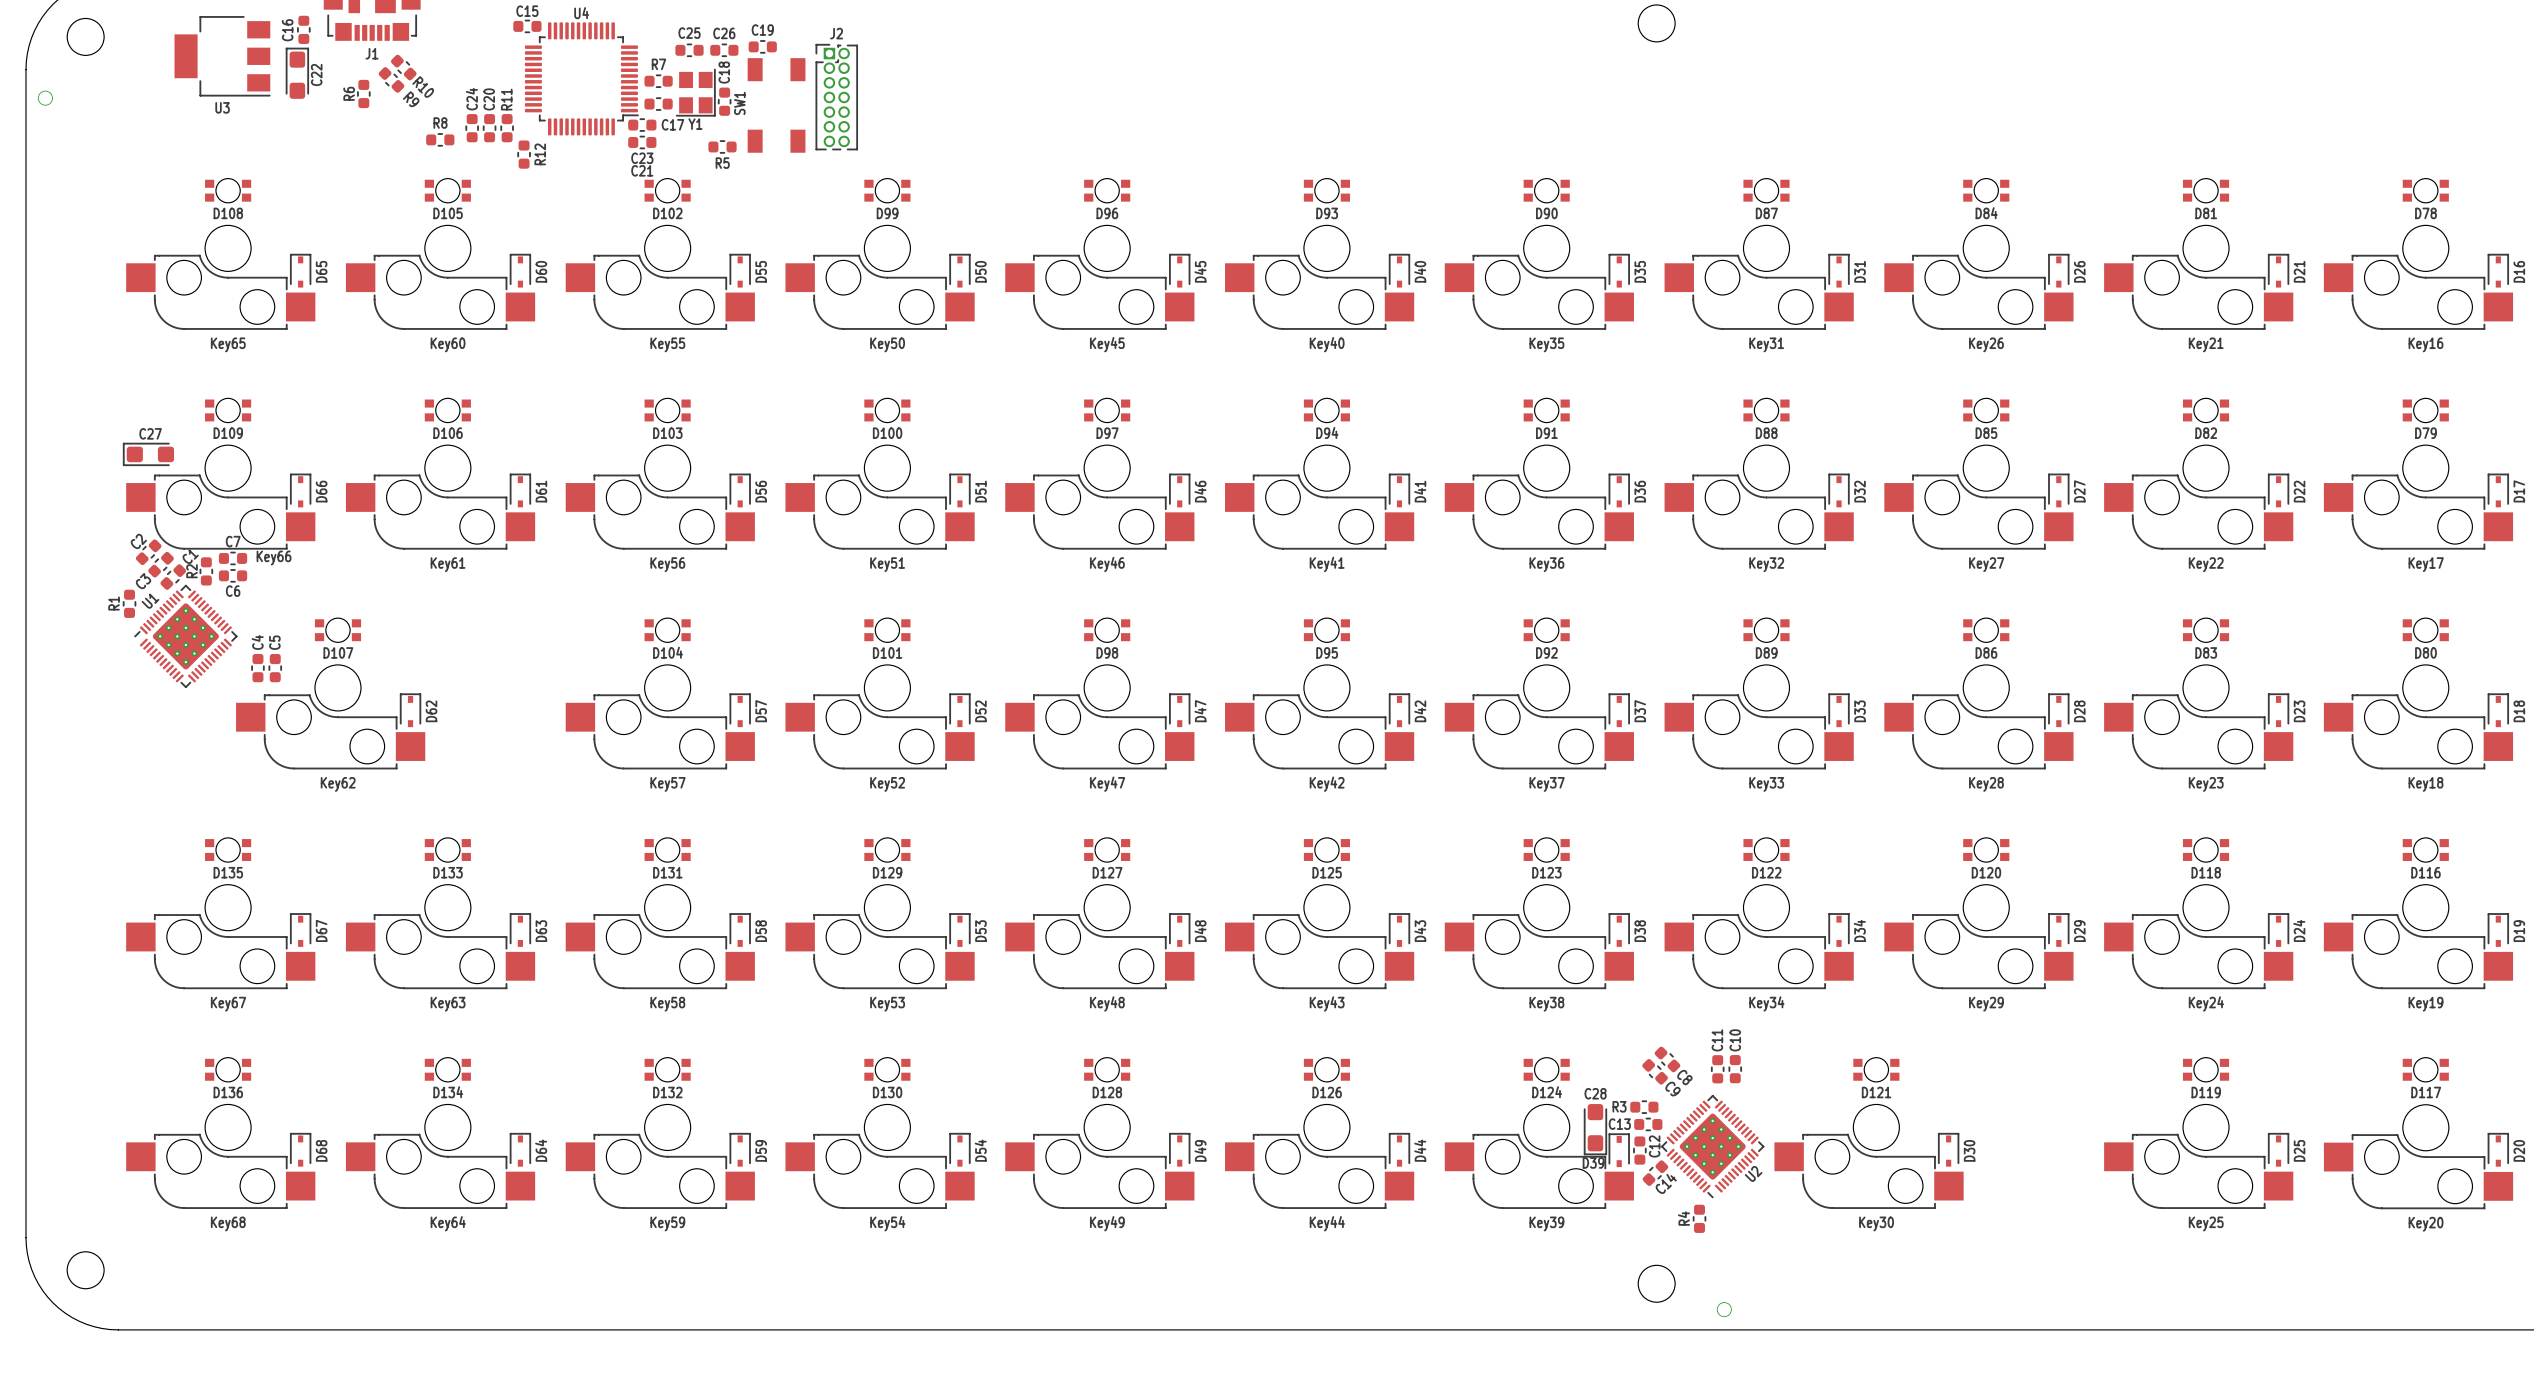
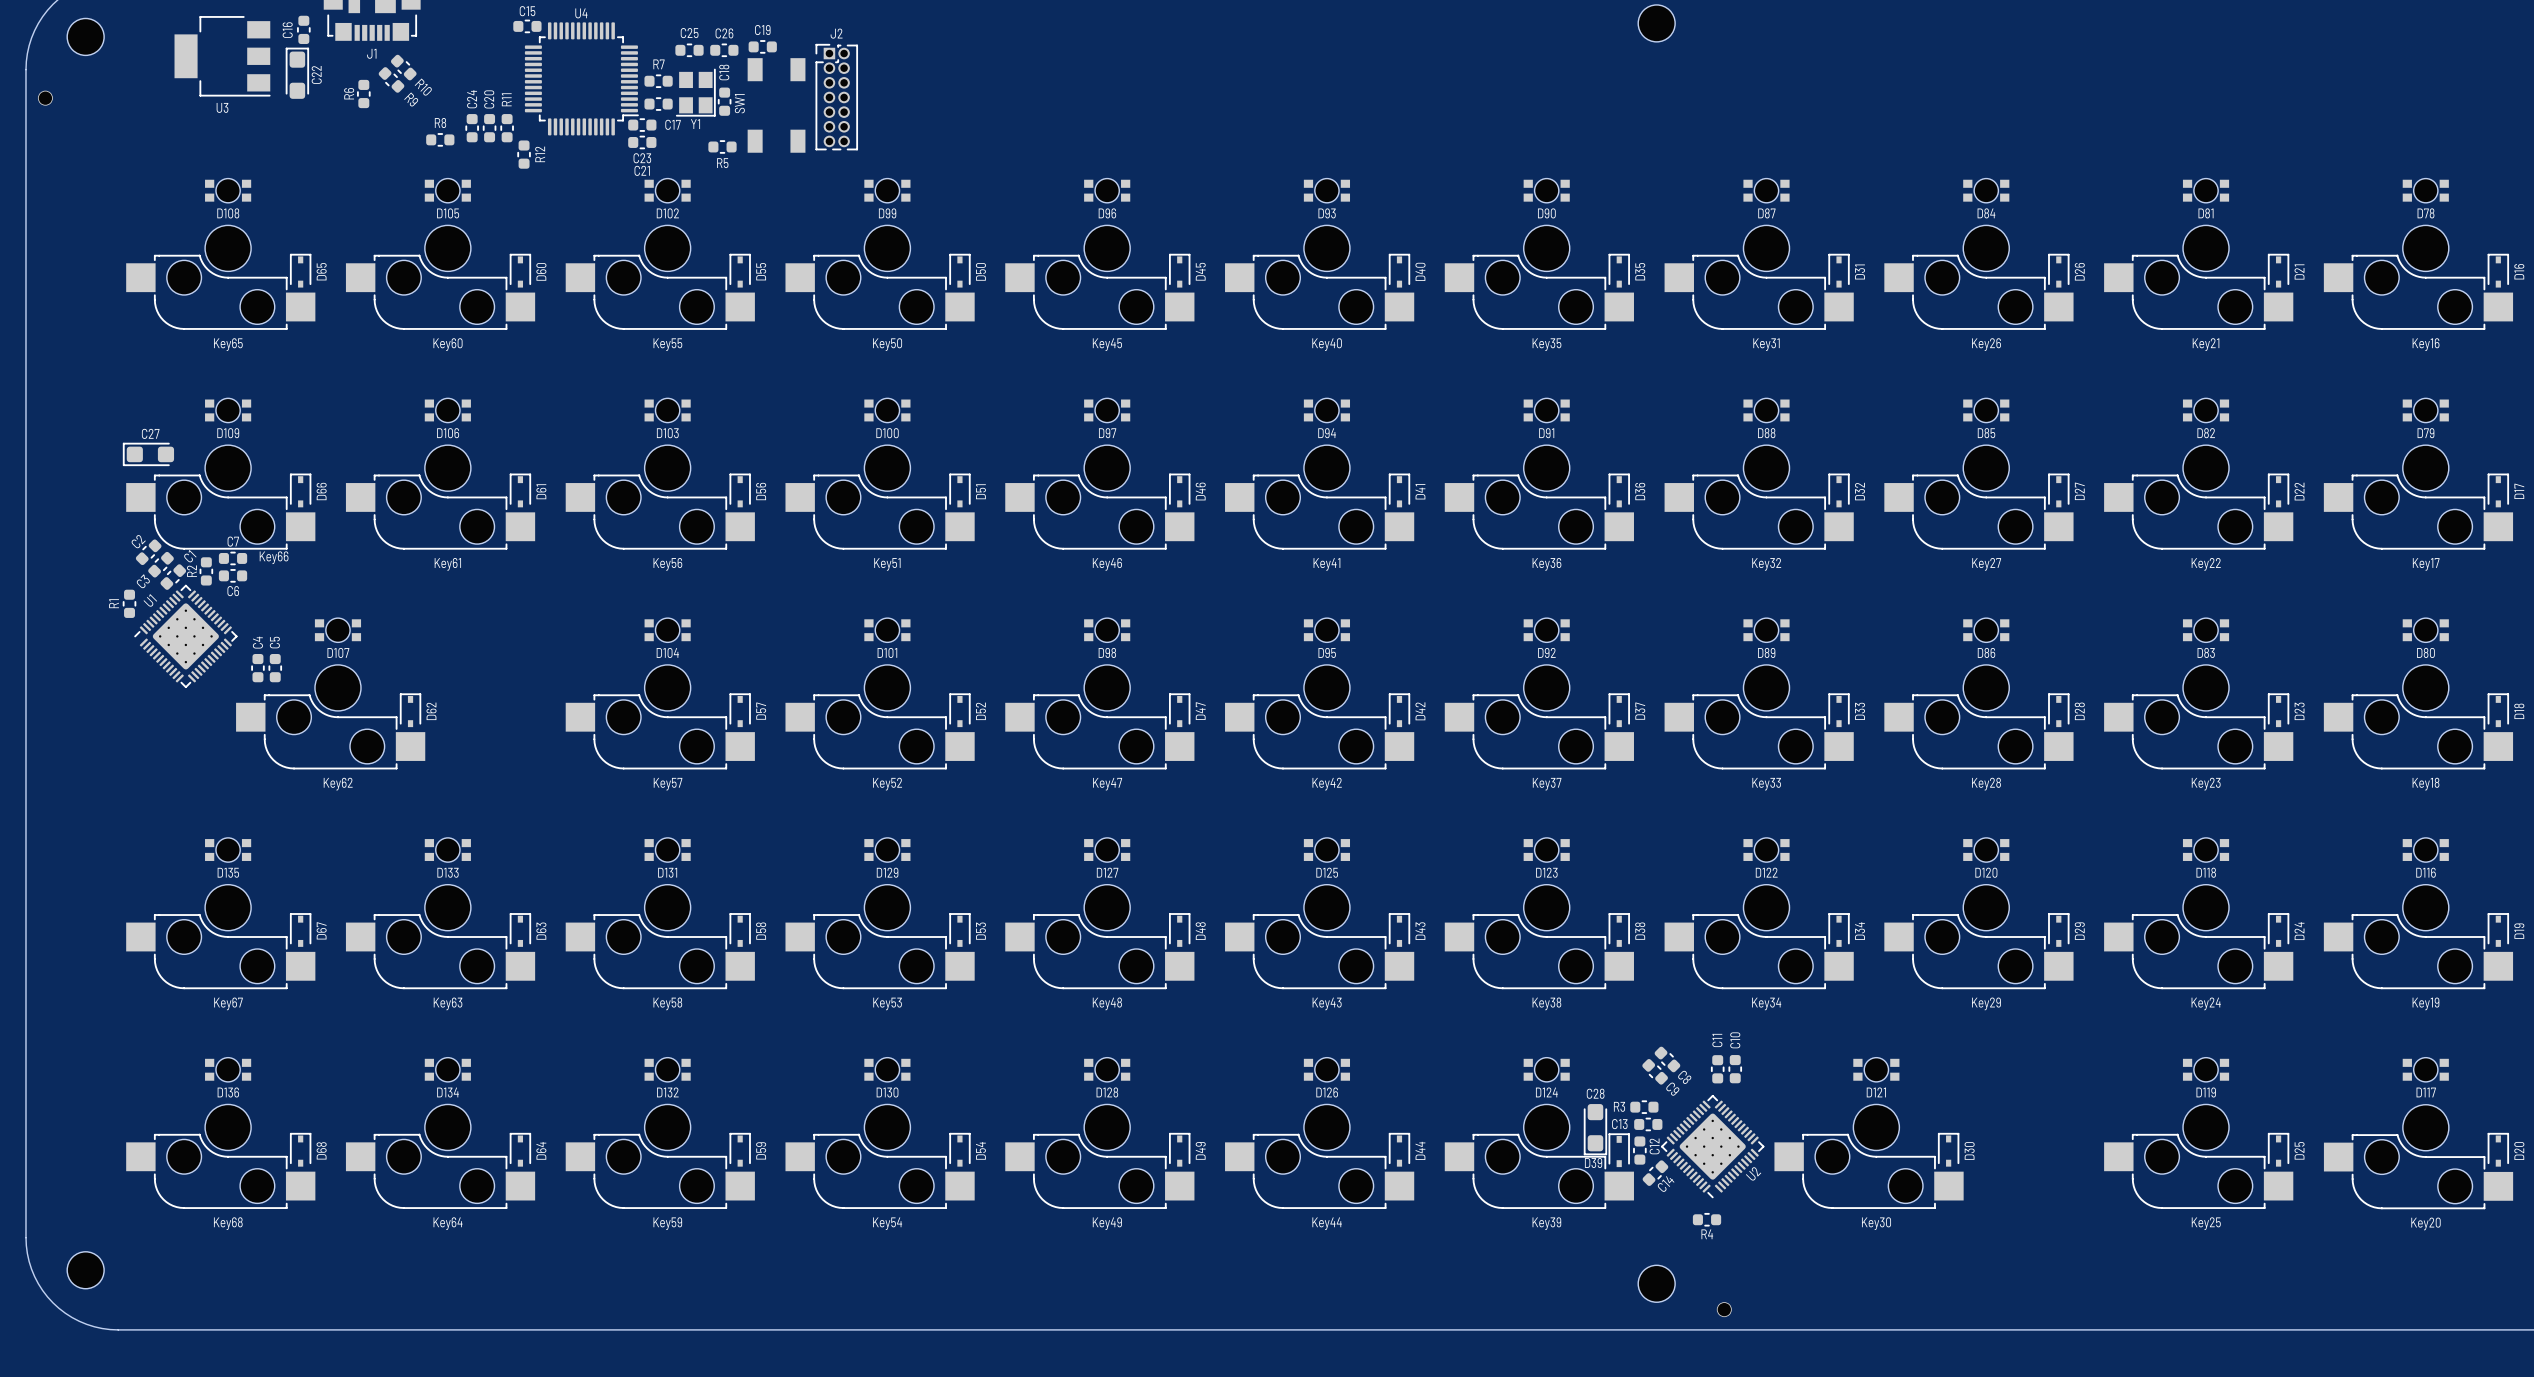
R4 rotation: 0° (1699, 1218) -> 90° clockwise (1707, 1219)

